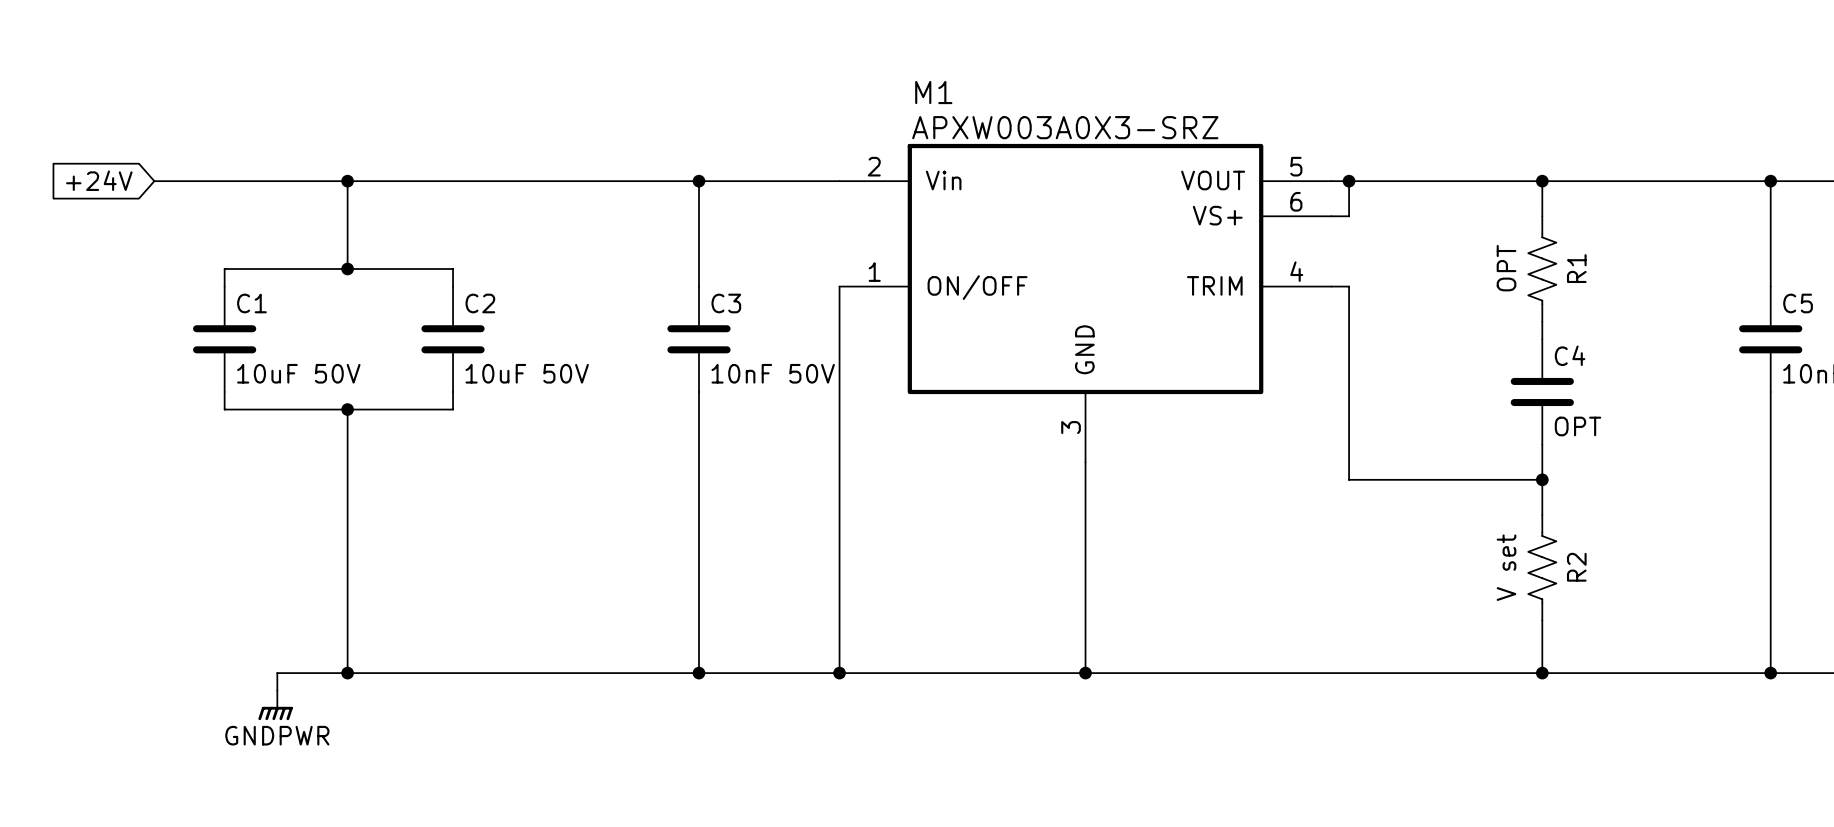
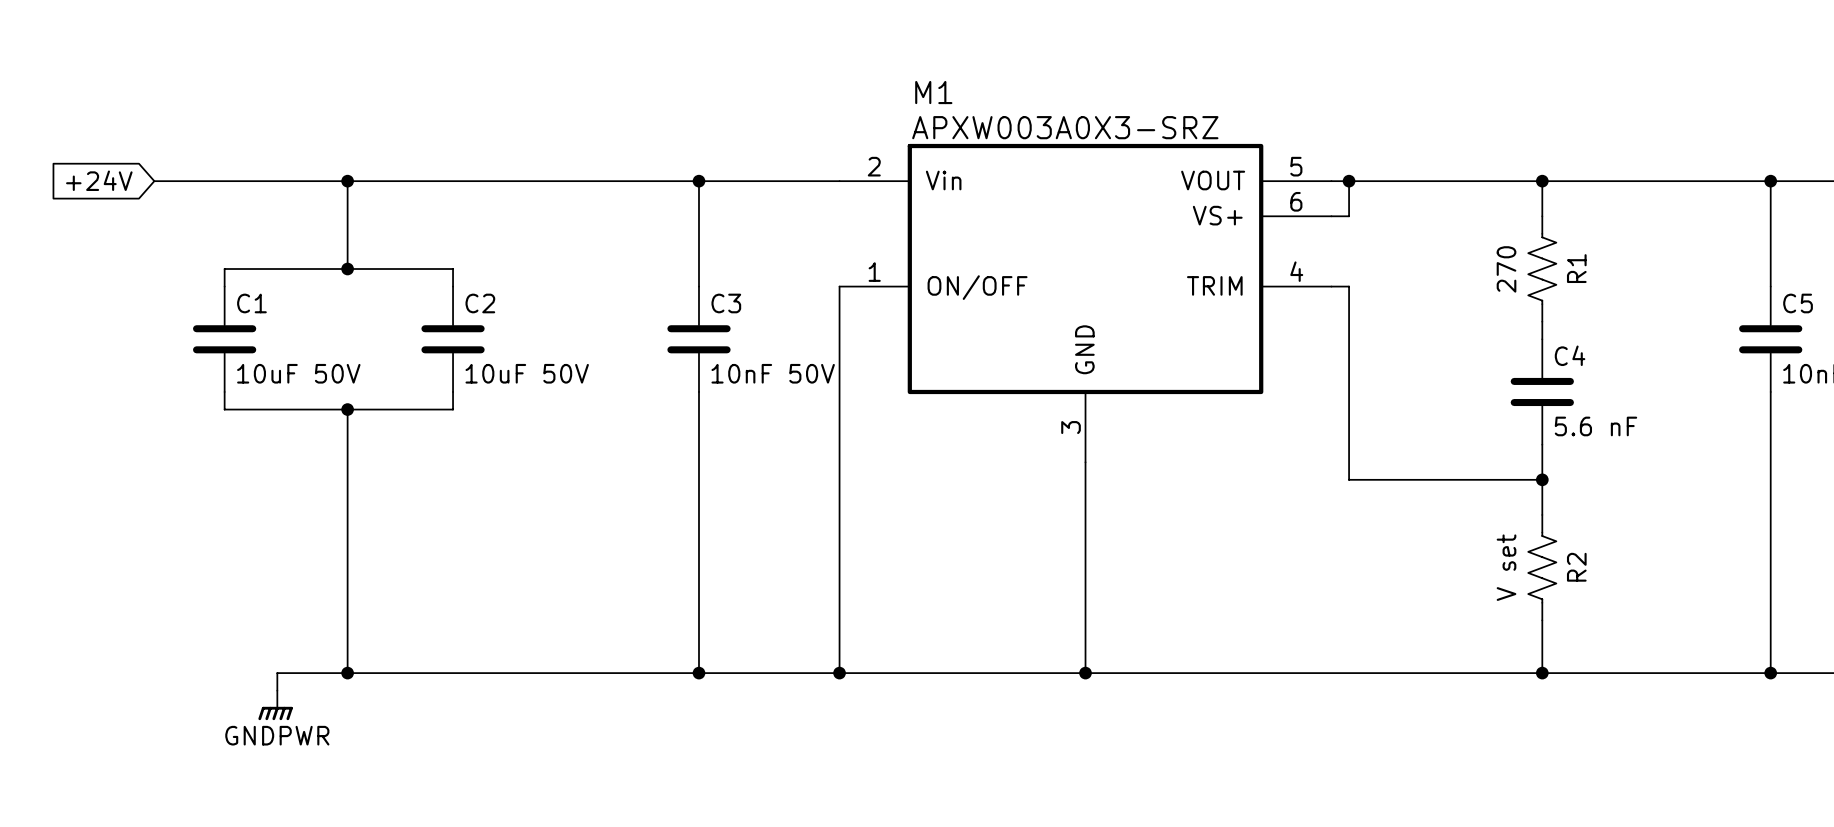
R1 value: OPT (1506, 268) -> 270 (1506, 269)
C4 value: OPT (1578, 426) -> 5.6 nF (1595, 426)

